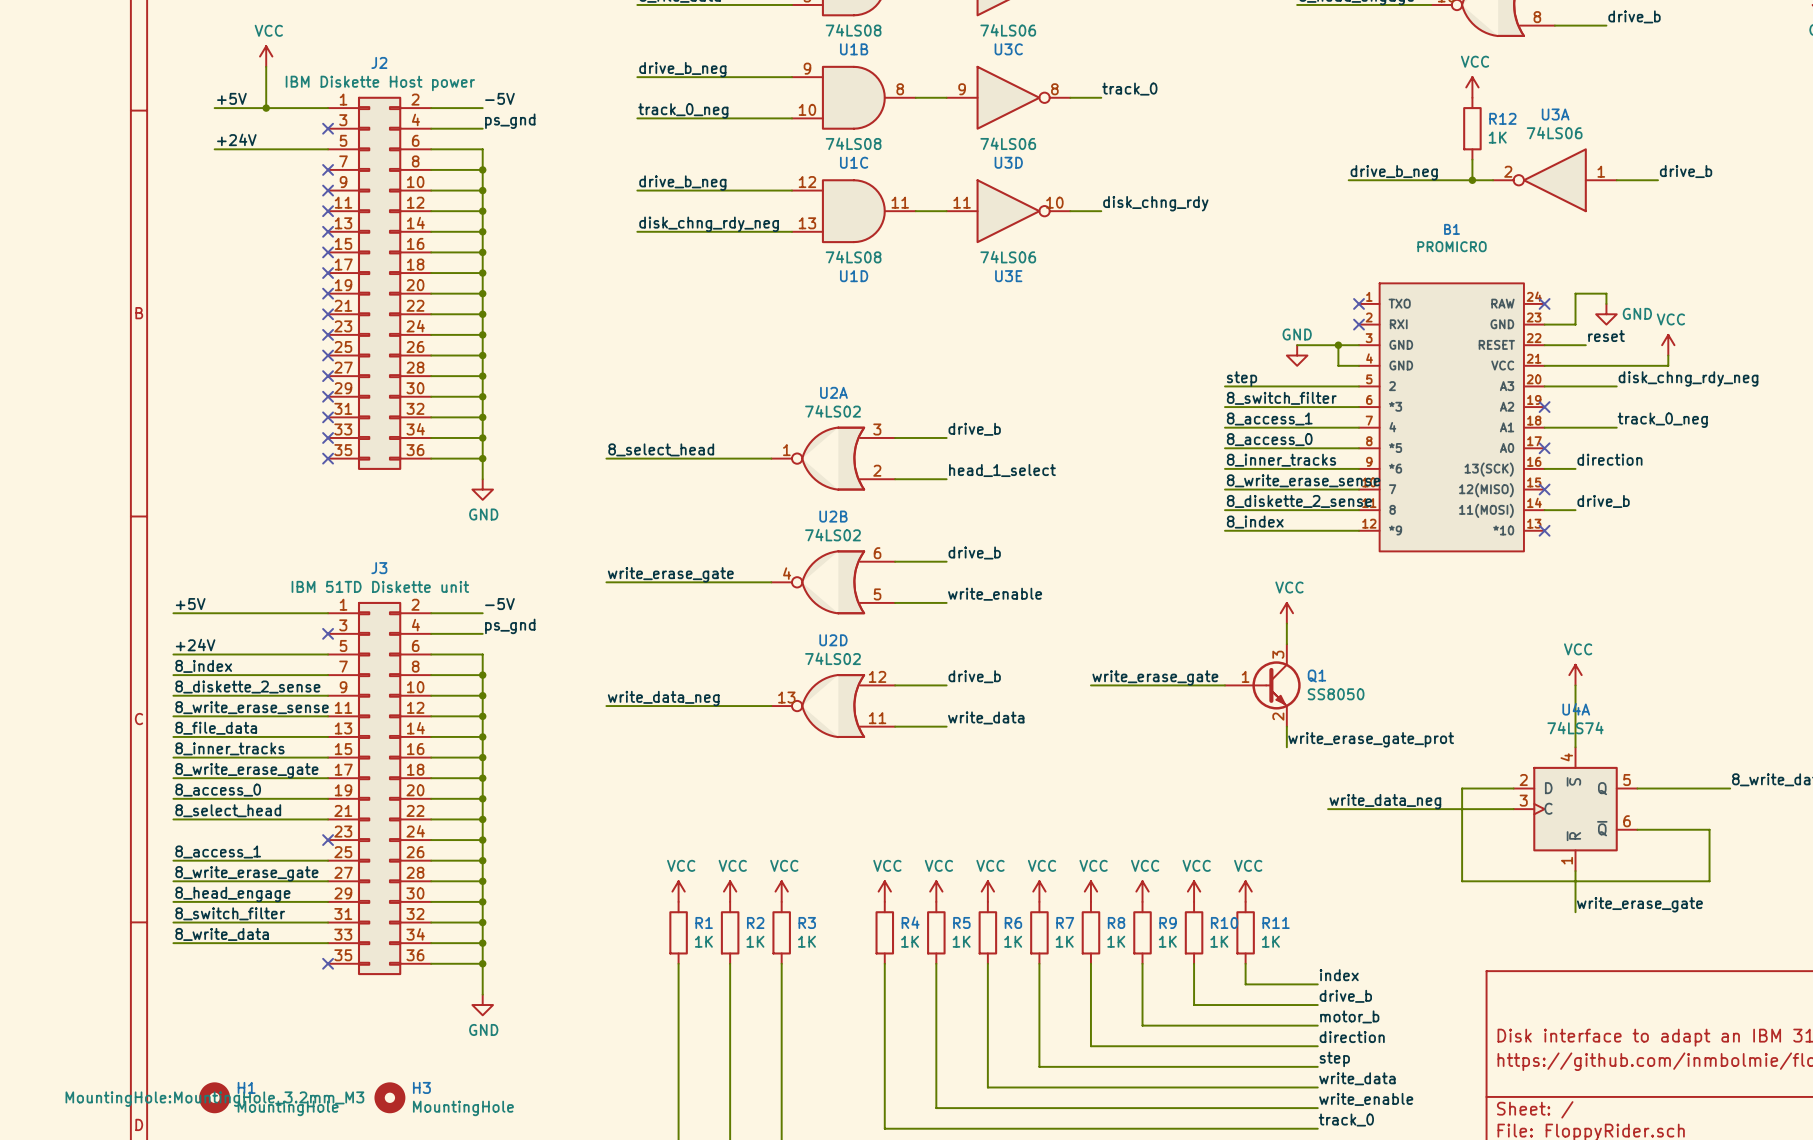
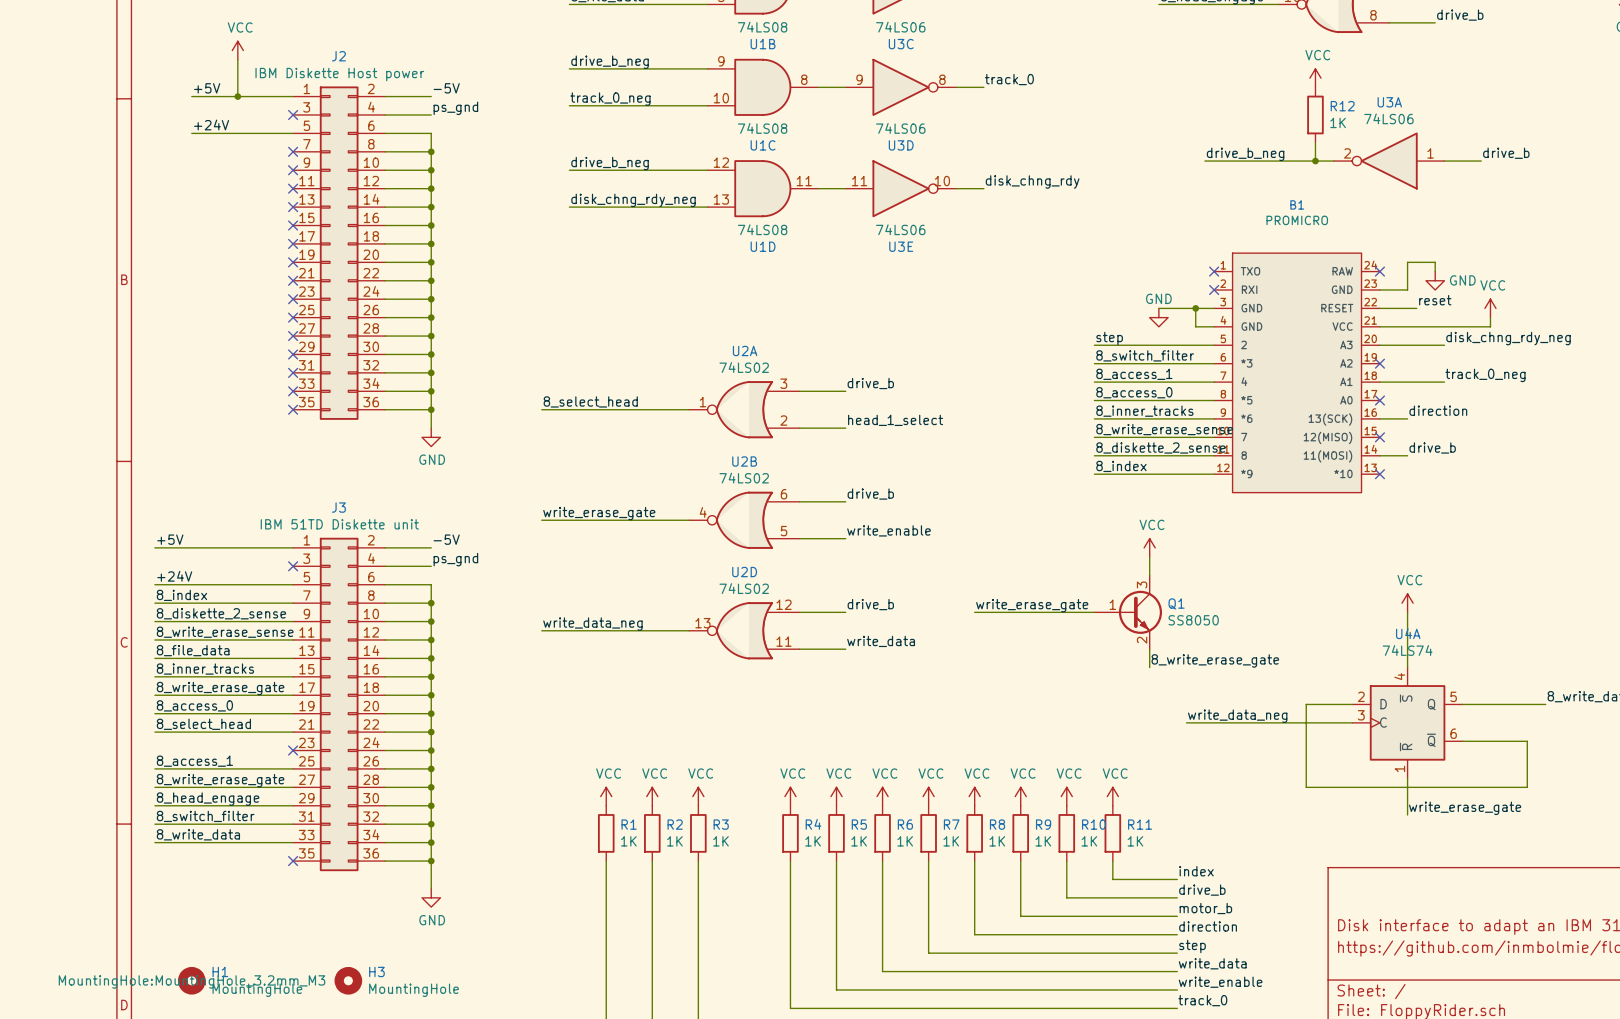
label: write_erase_gate_prot (1371, 739) -> 8_write_erase_gate (1215, 660)

